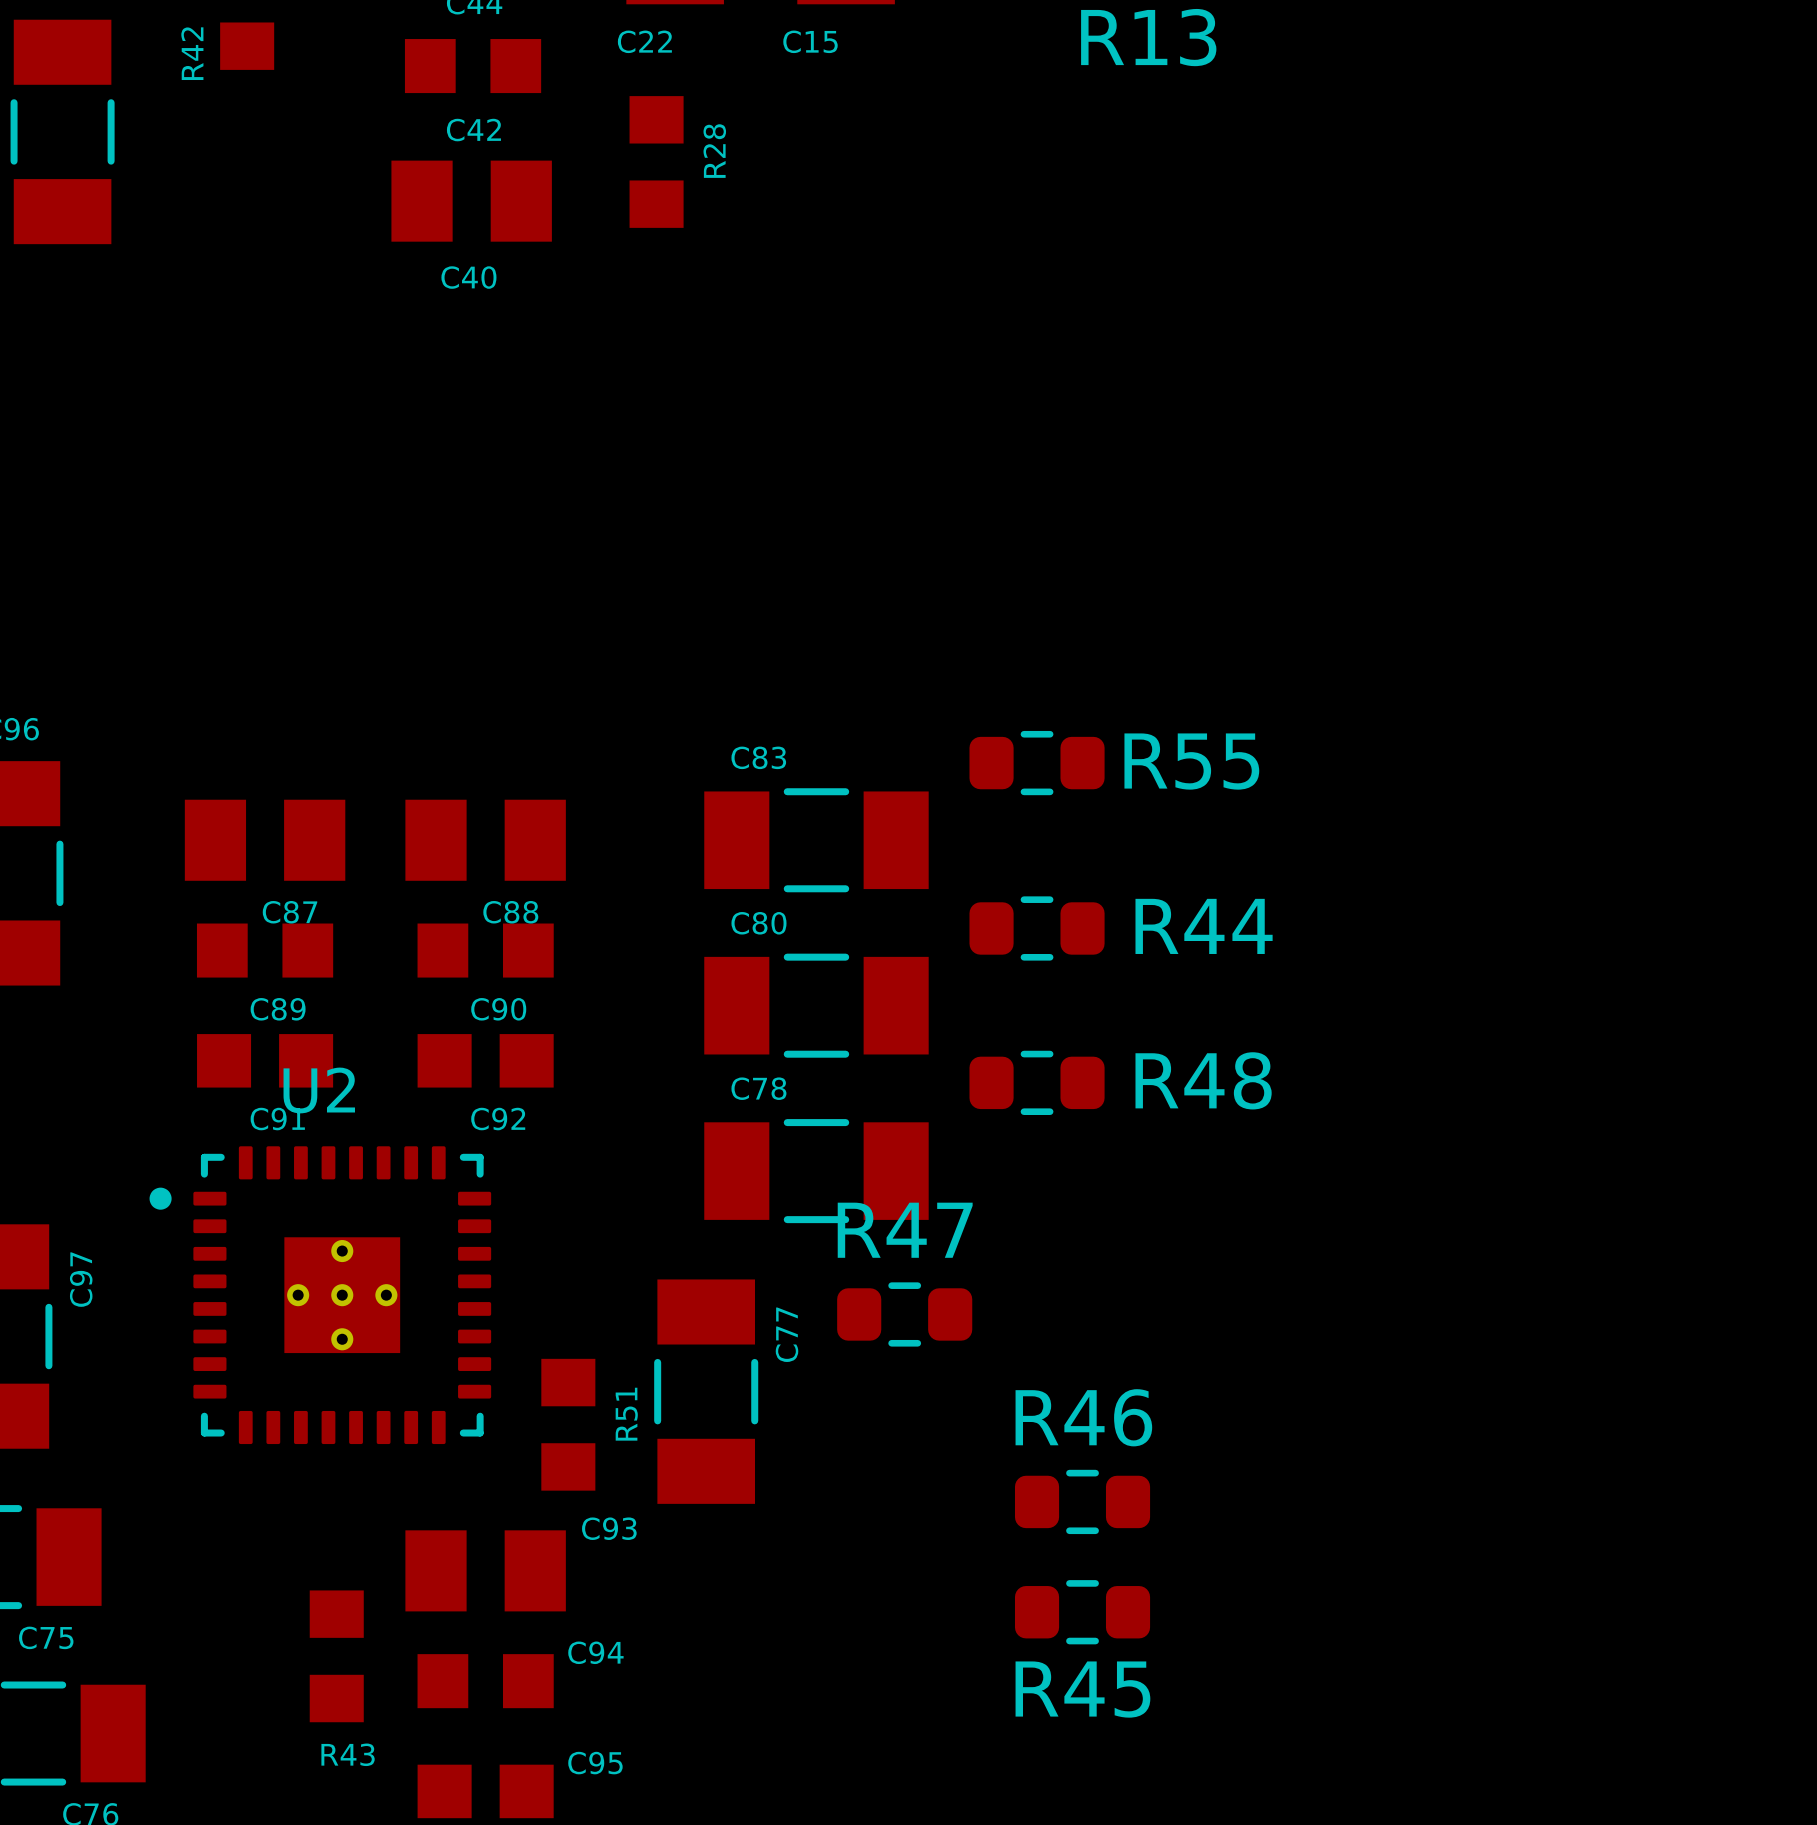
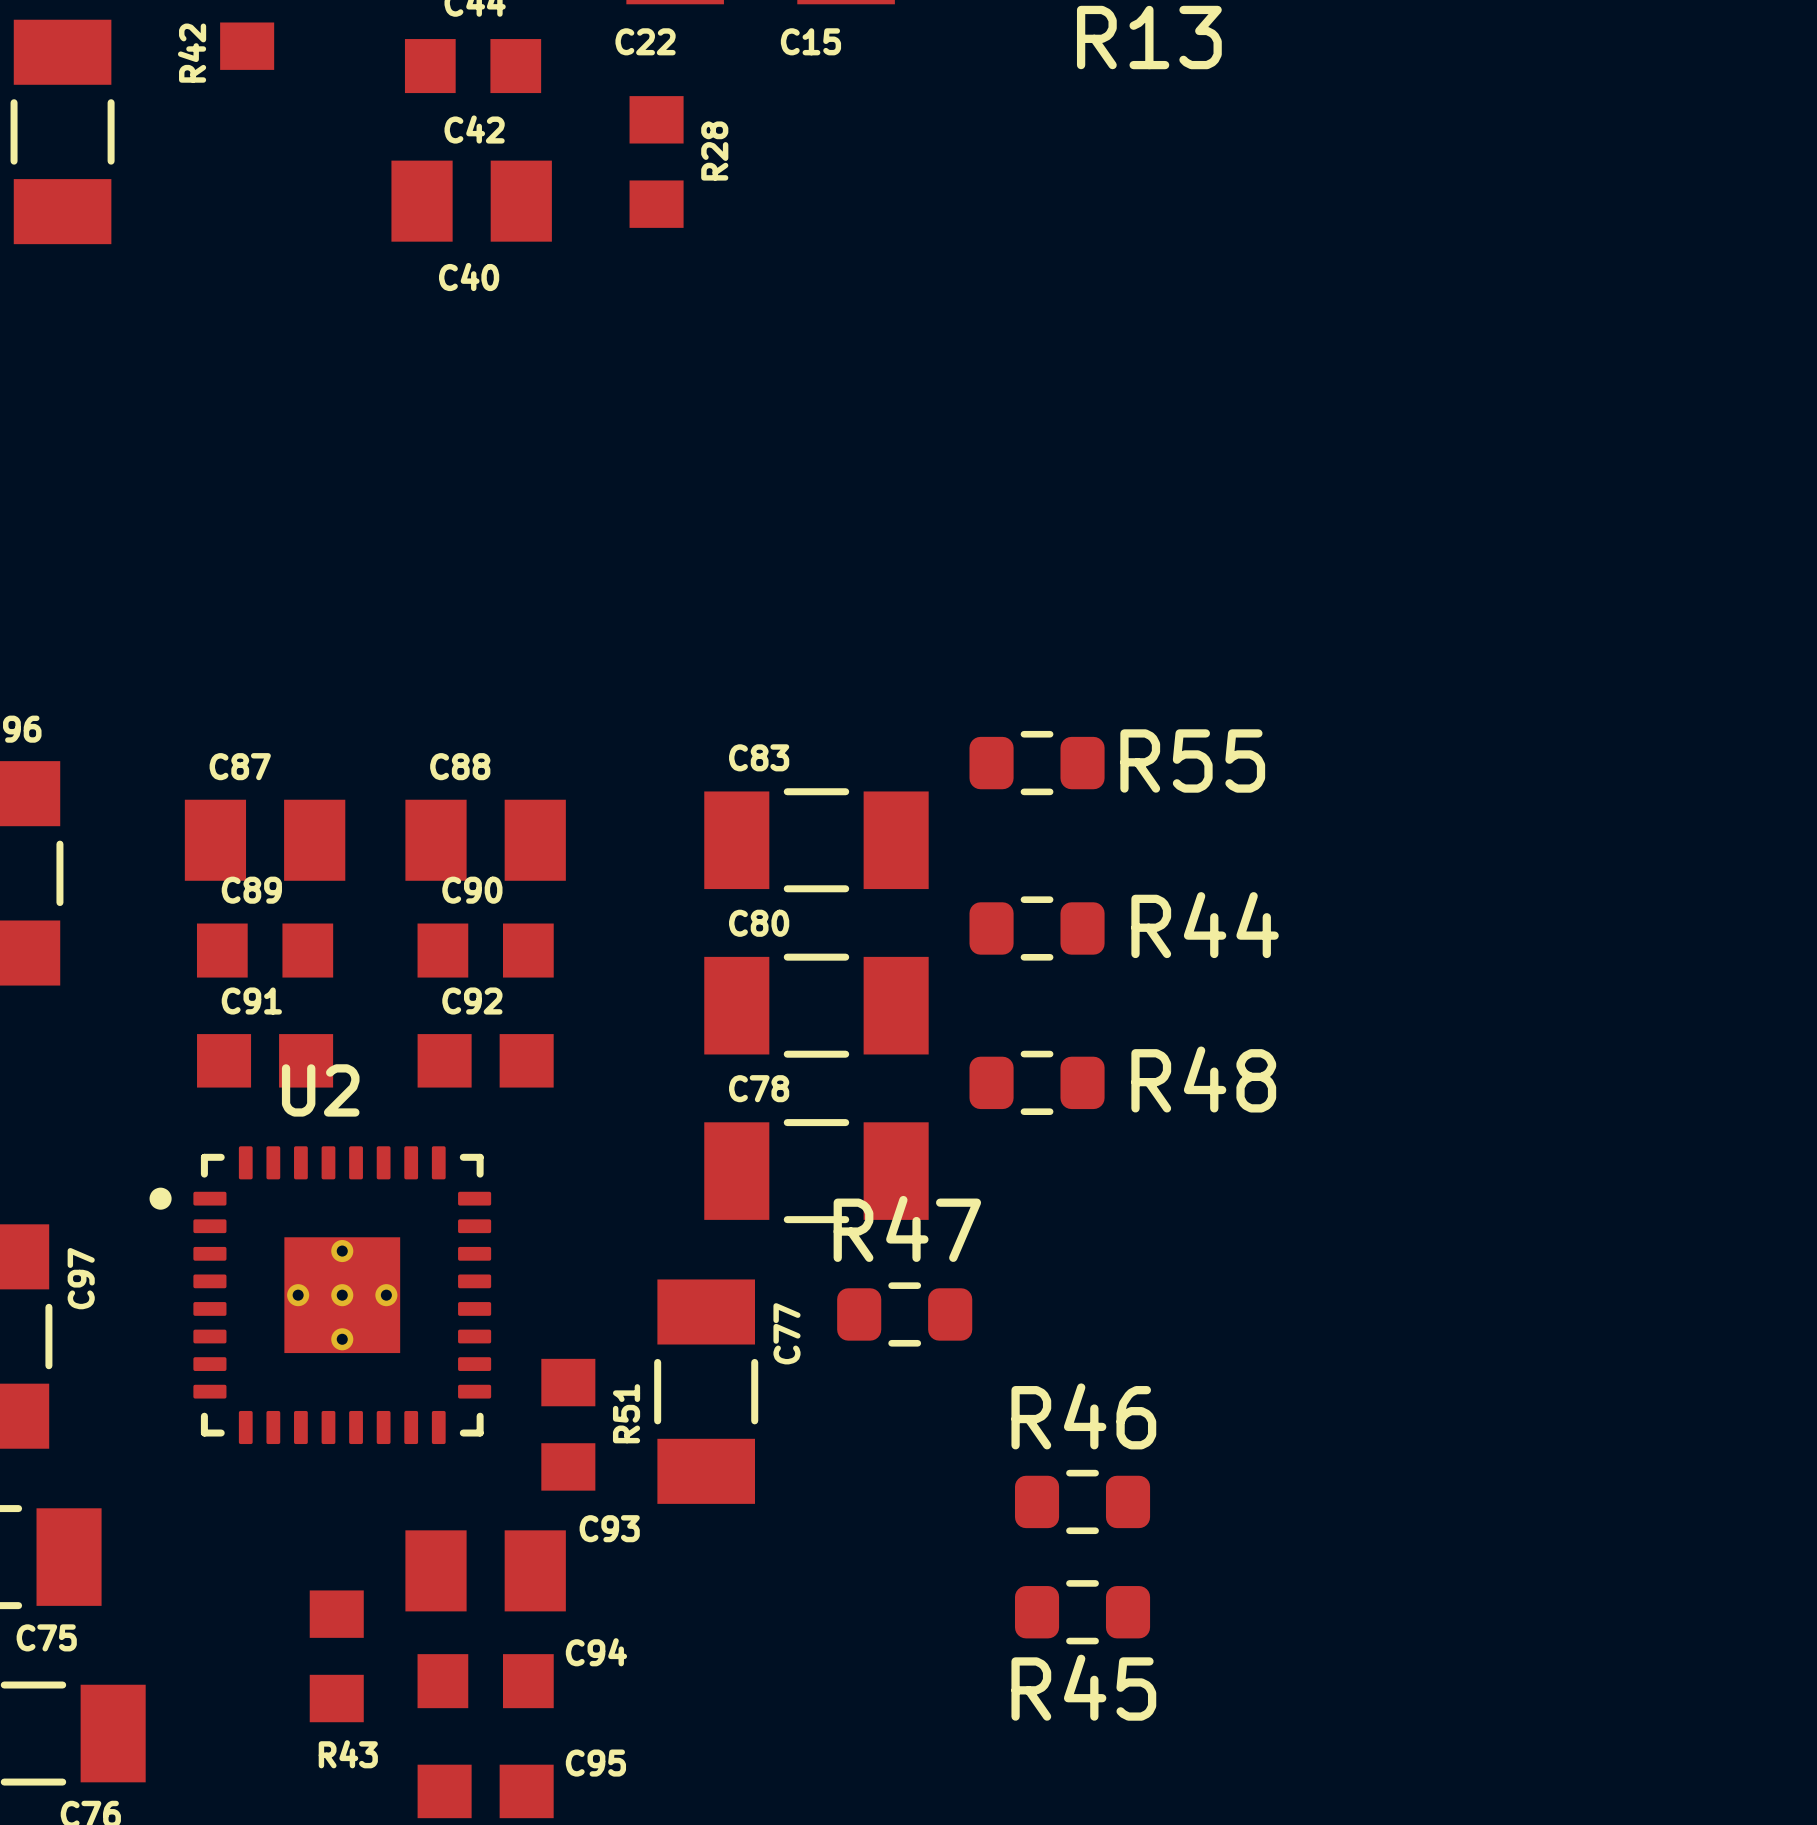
C87 name position: C87 (289, 912) -> C87 (240, 766)
C88 name position: C88 (510, 912) -> C88 (460, 766)
C89 name position: C89 (278, 1009) -> C89 (251, 890)
C90 name position: C90 (498, 1009) -> C90 (472, 890)
C91 name position: C91 (277, 1119) -> C91 (251, 1001)
C92 name position: C92 (498, 1119) -> C92 (472, 1001)

